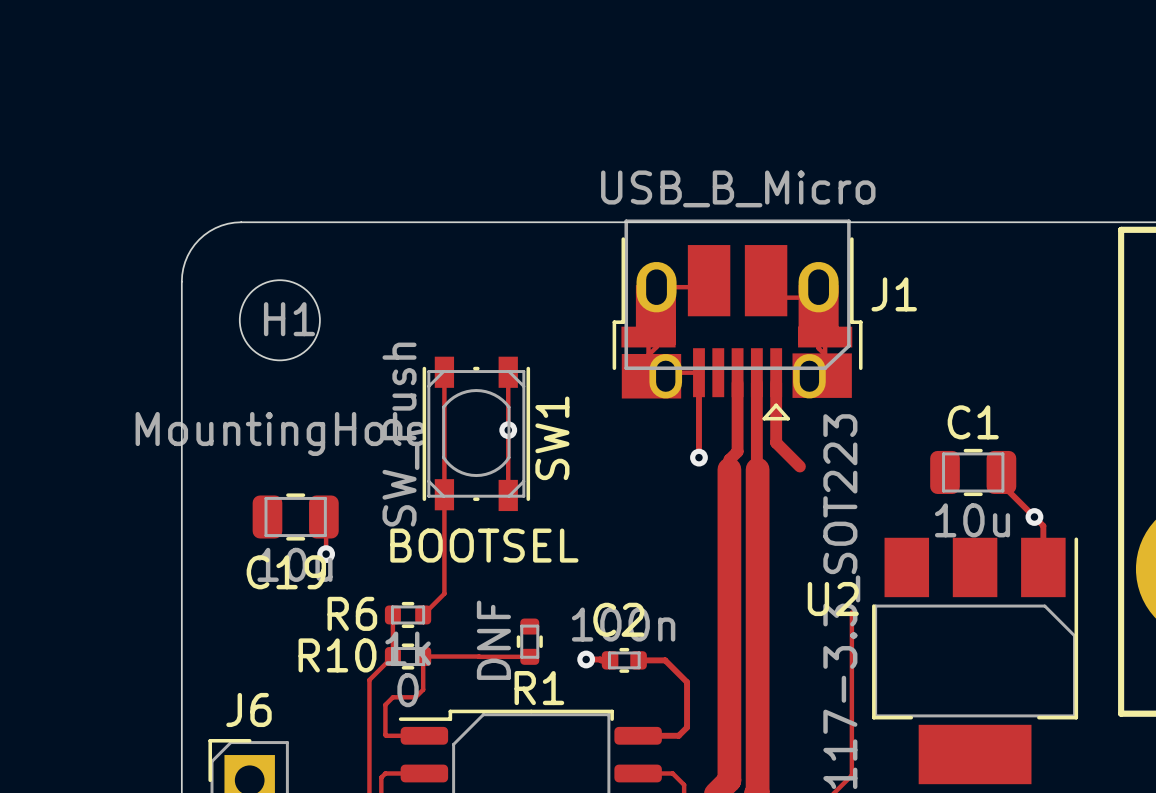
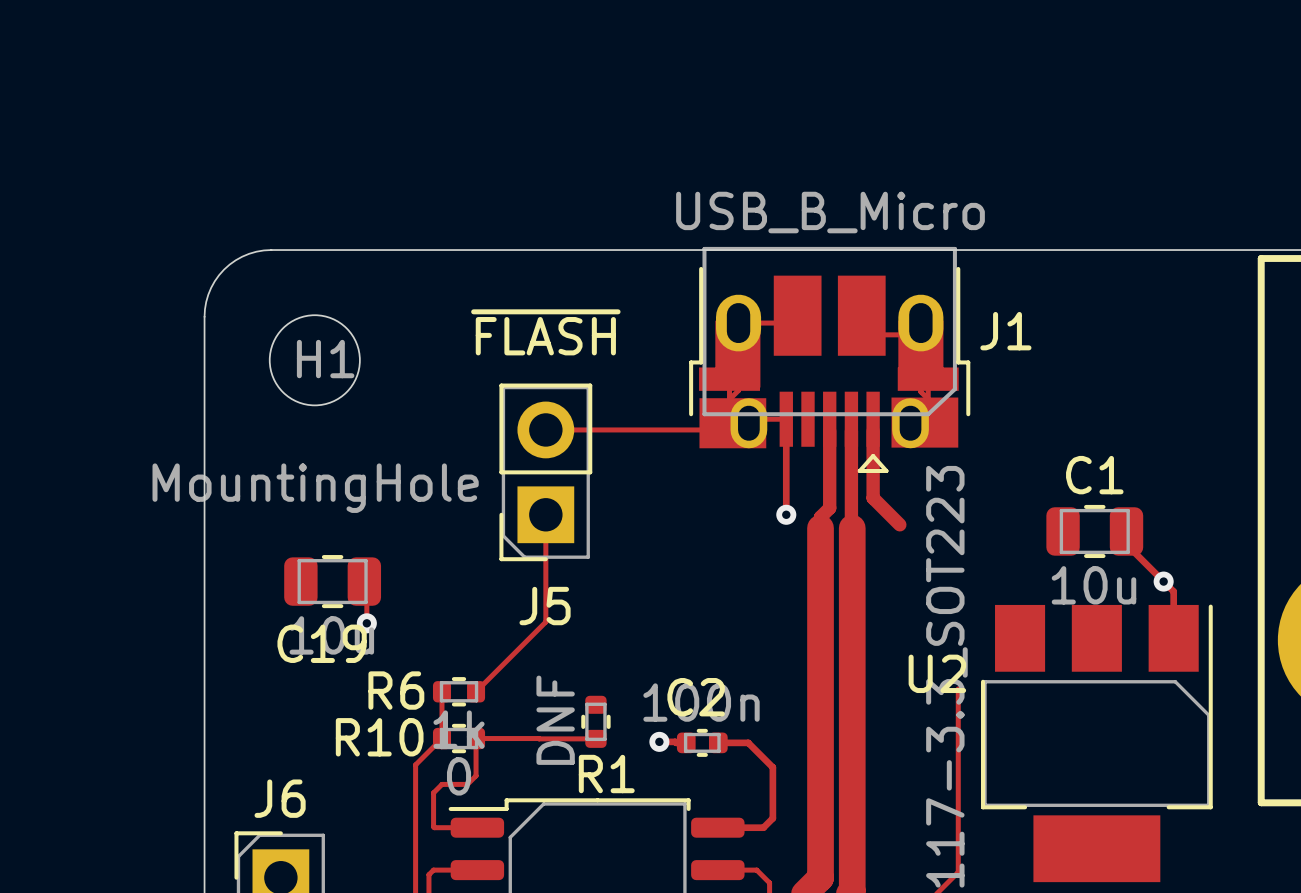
track: (444, 372) (444, 593) -> (545, 514) (545, 621) (499, 667)
track: (508, 372) (508, 495) -> none
track: none -> (732, 423) (726, 429) (545, 429)
J5: none -> ~{FLASH} (545, 472)
via: (508, 430) -> none
SW1: SW_Push (476, 433) -> none
text: BOOTSEL (484, 545) -> none

